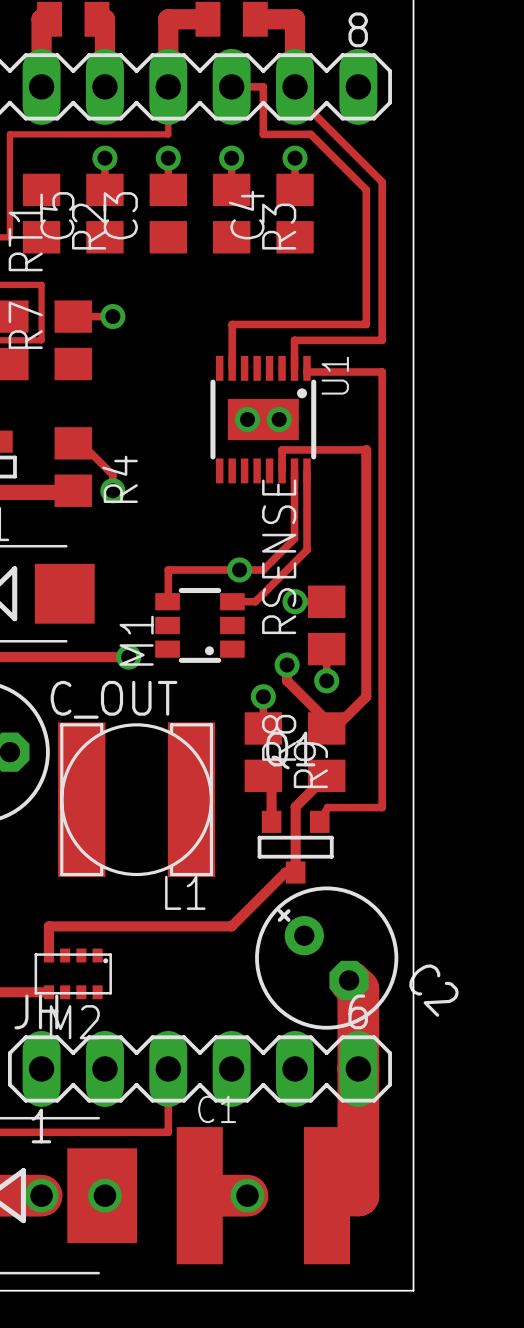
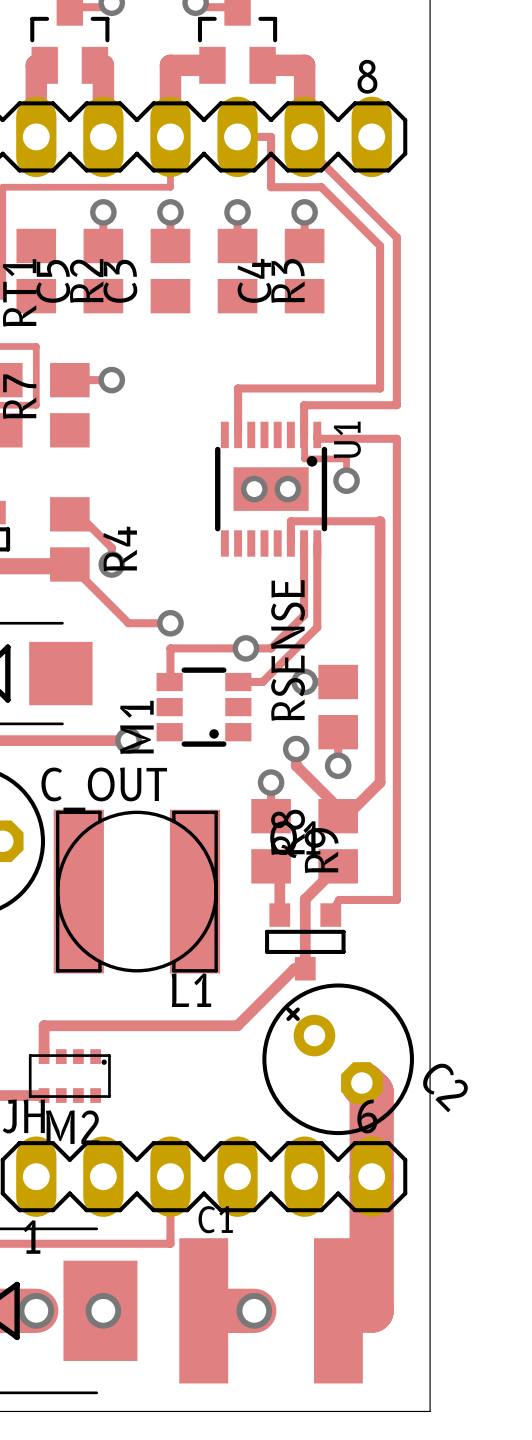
track: none -> (304, 434) (304, 458) (346, 458) (346, 480)
via: none -> (346, 480)
track: none -> (69, 564) (128, 623) (170, 623)
via: none -> (170, 623)

